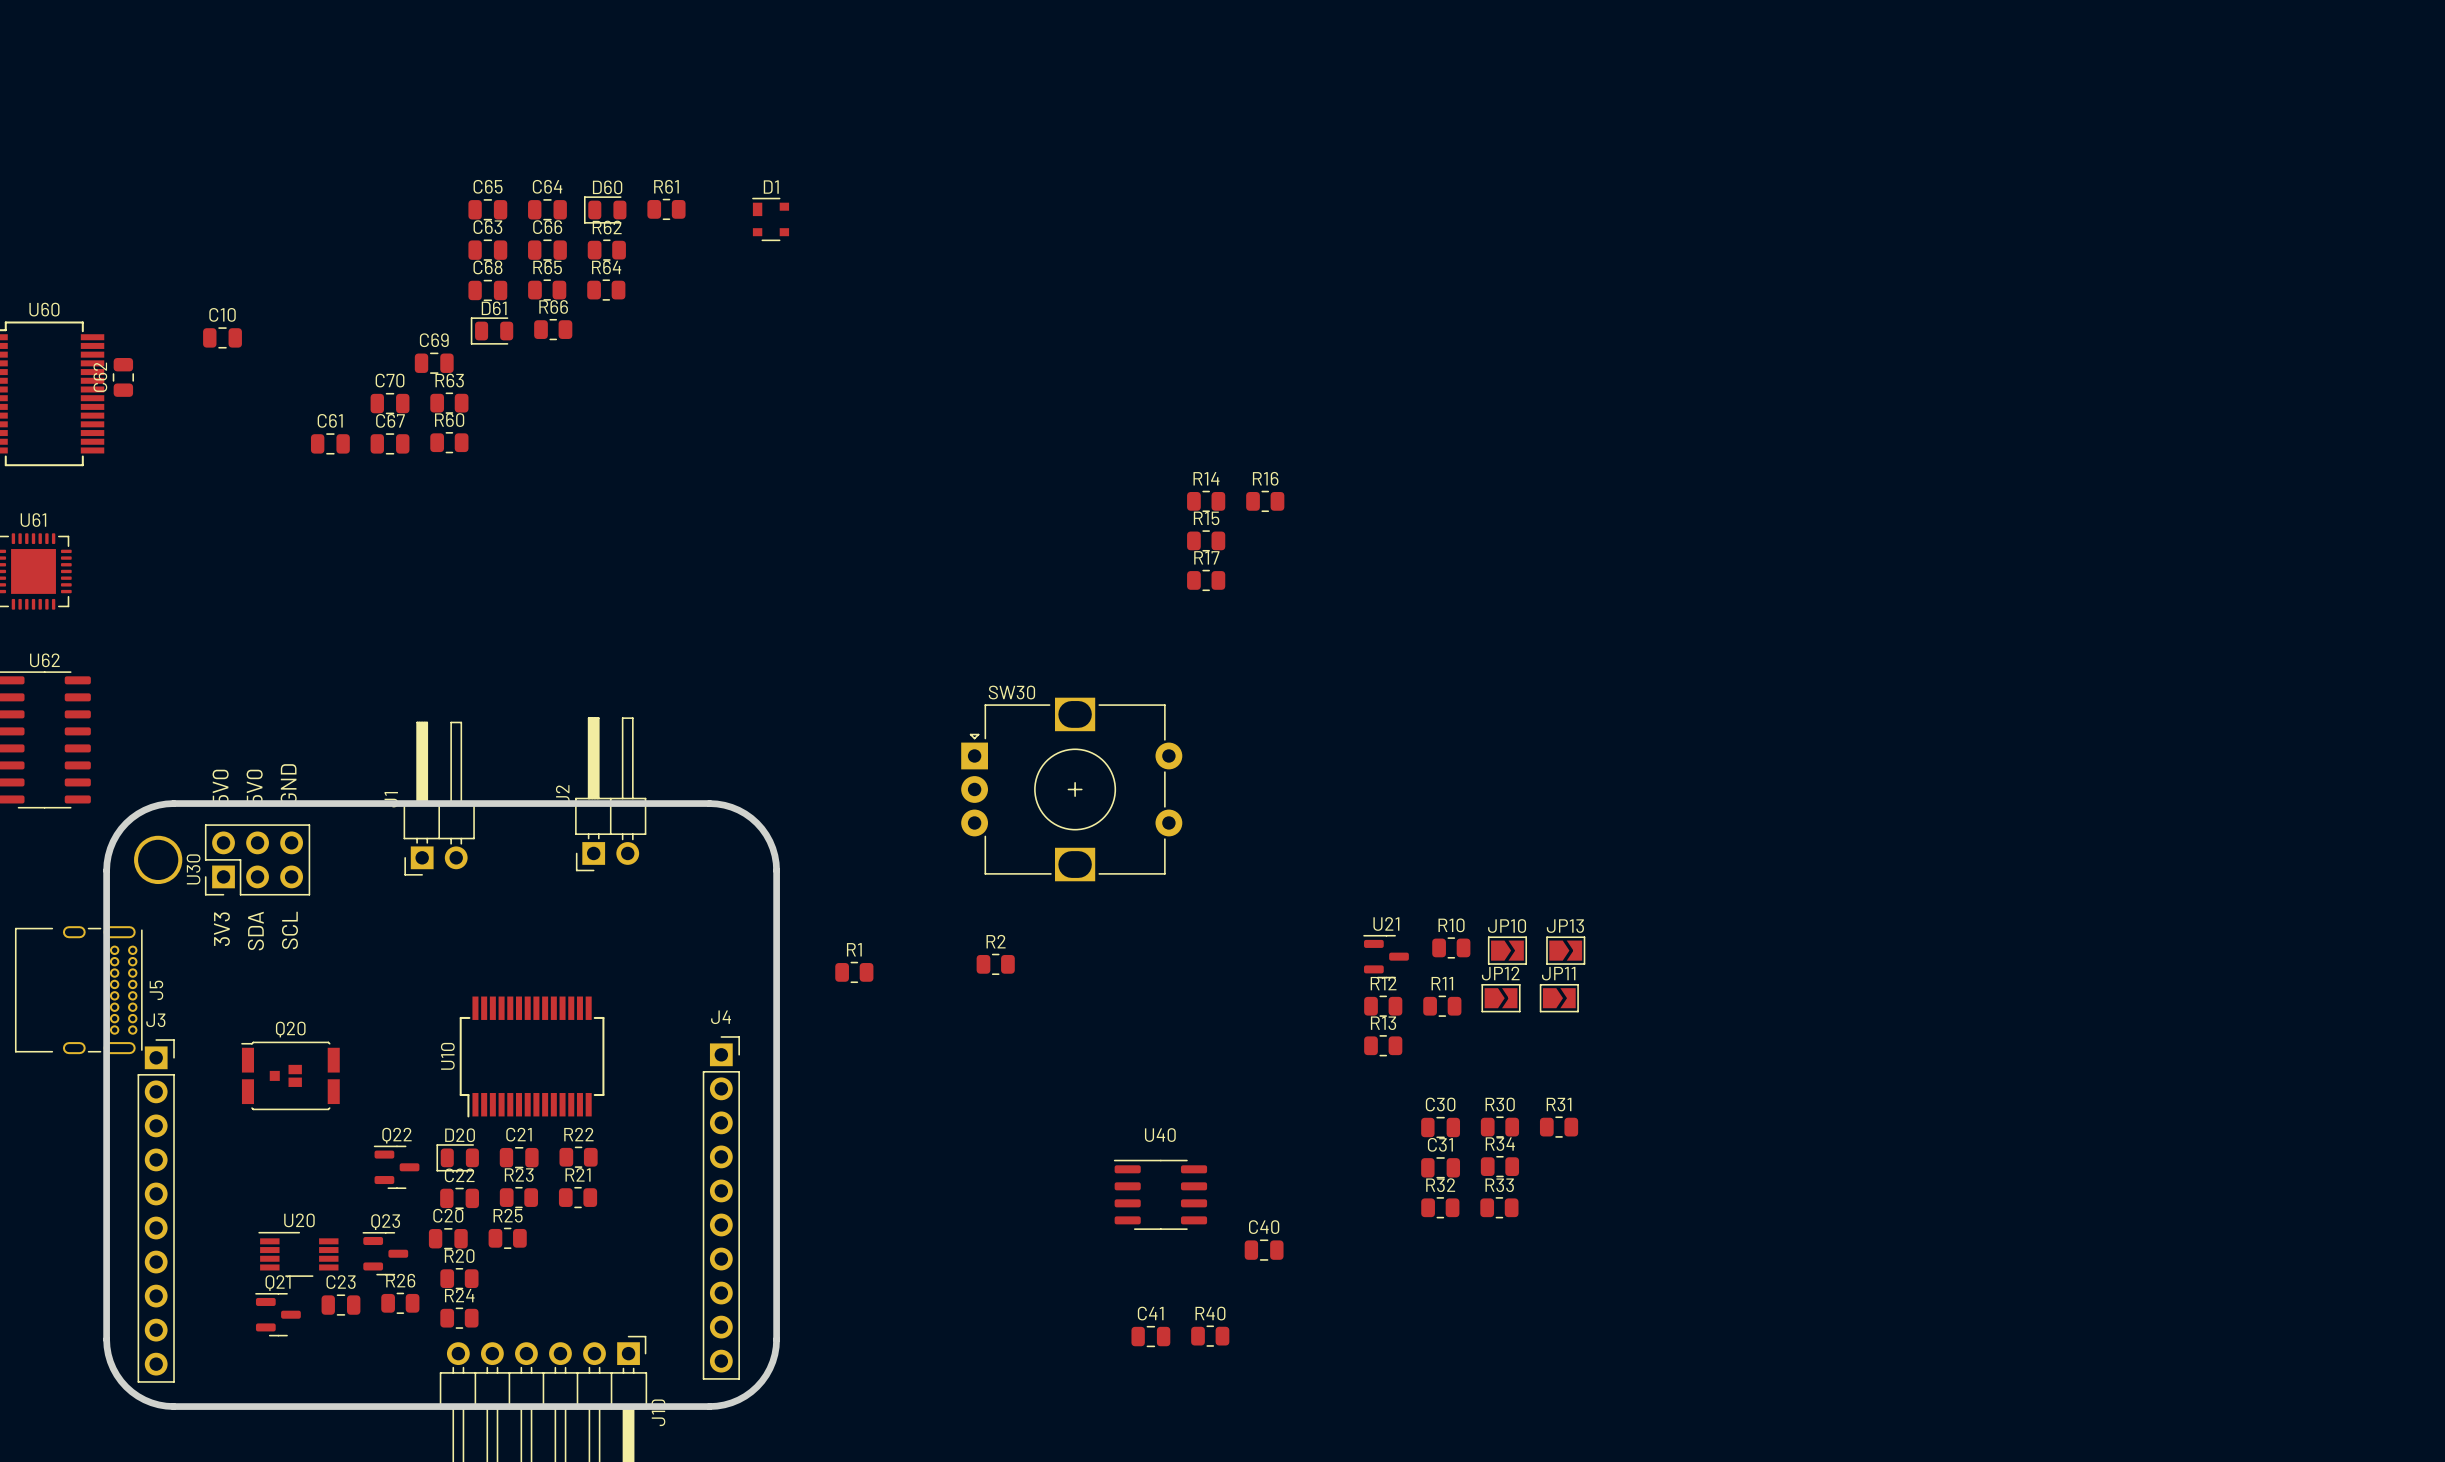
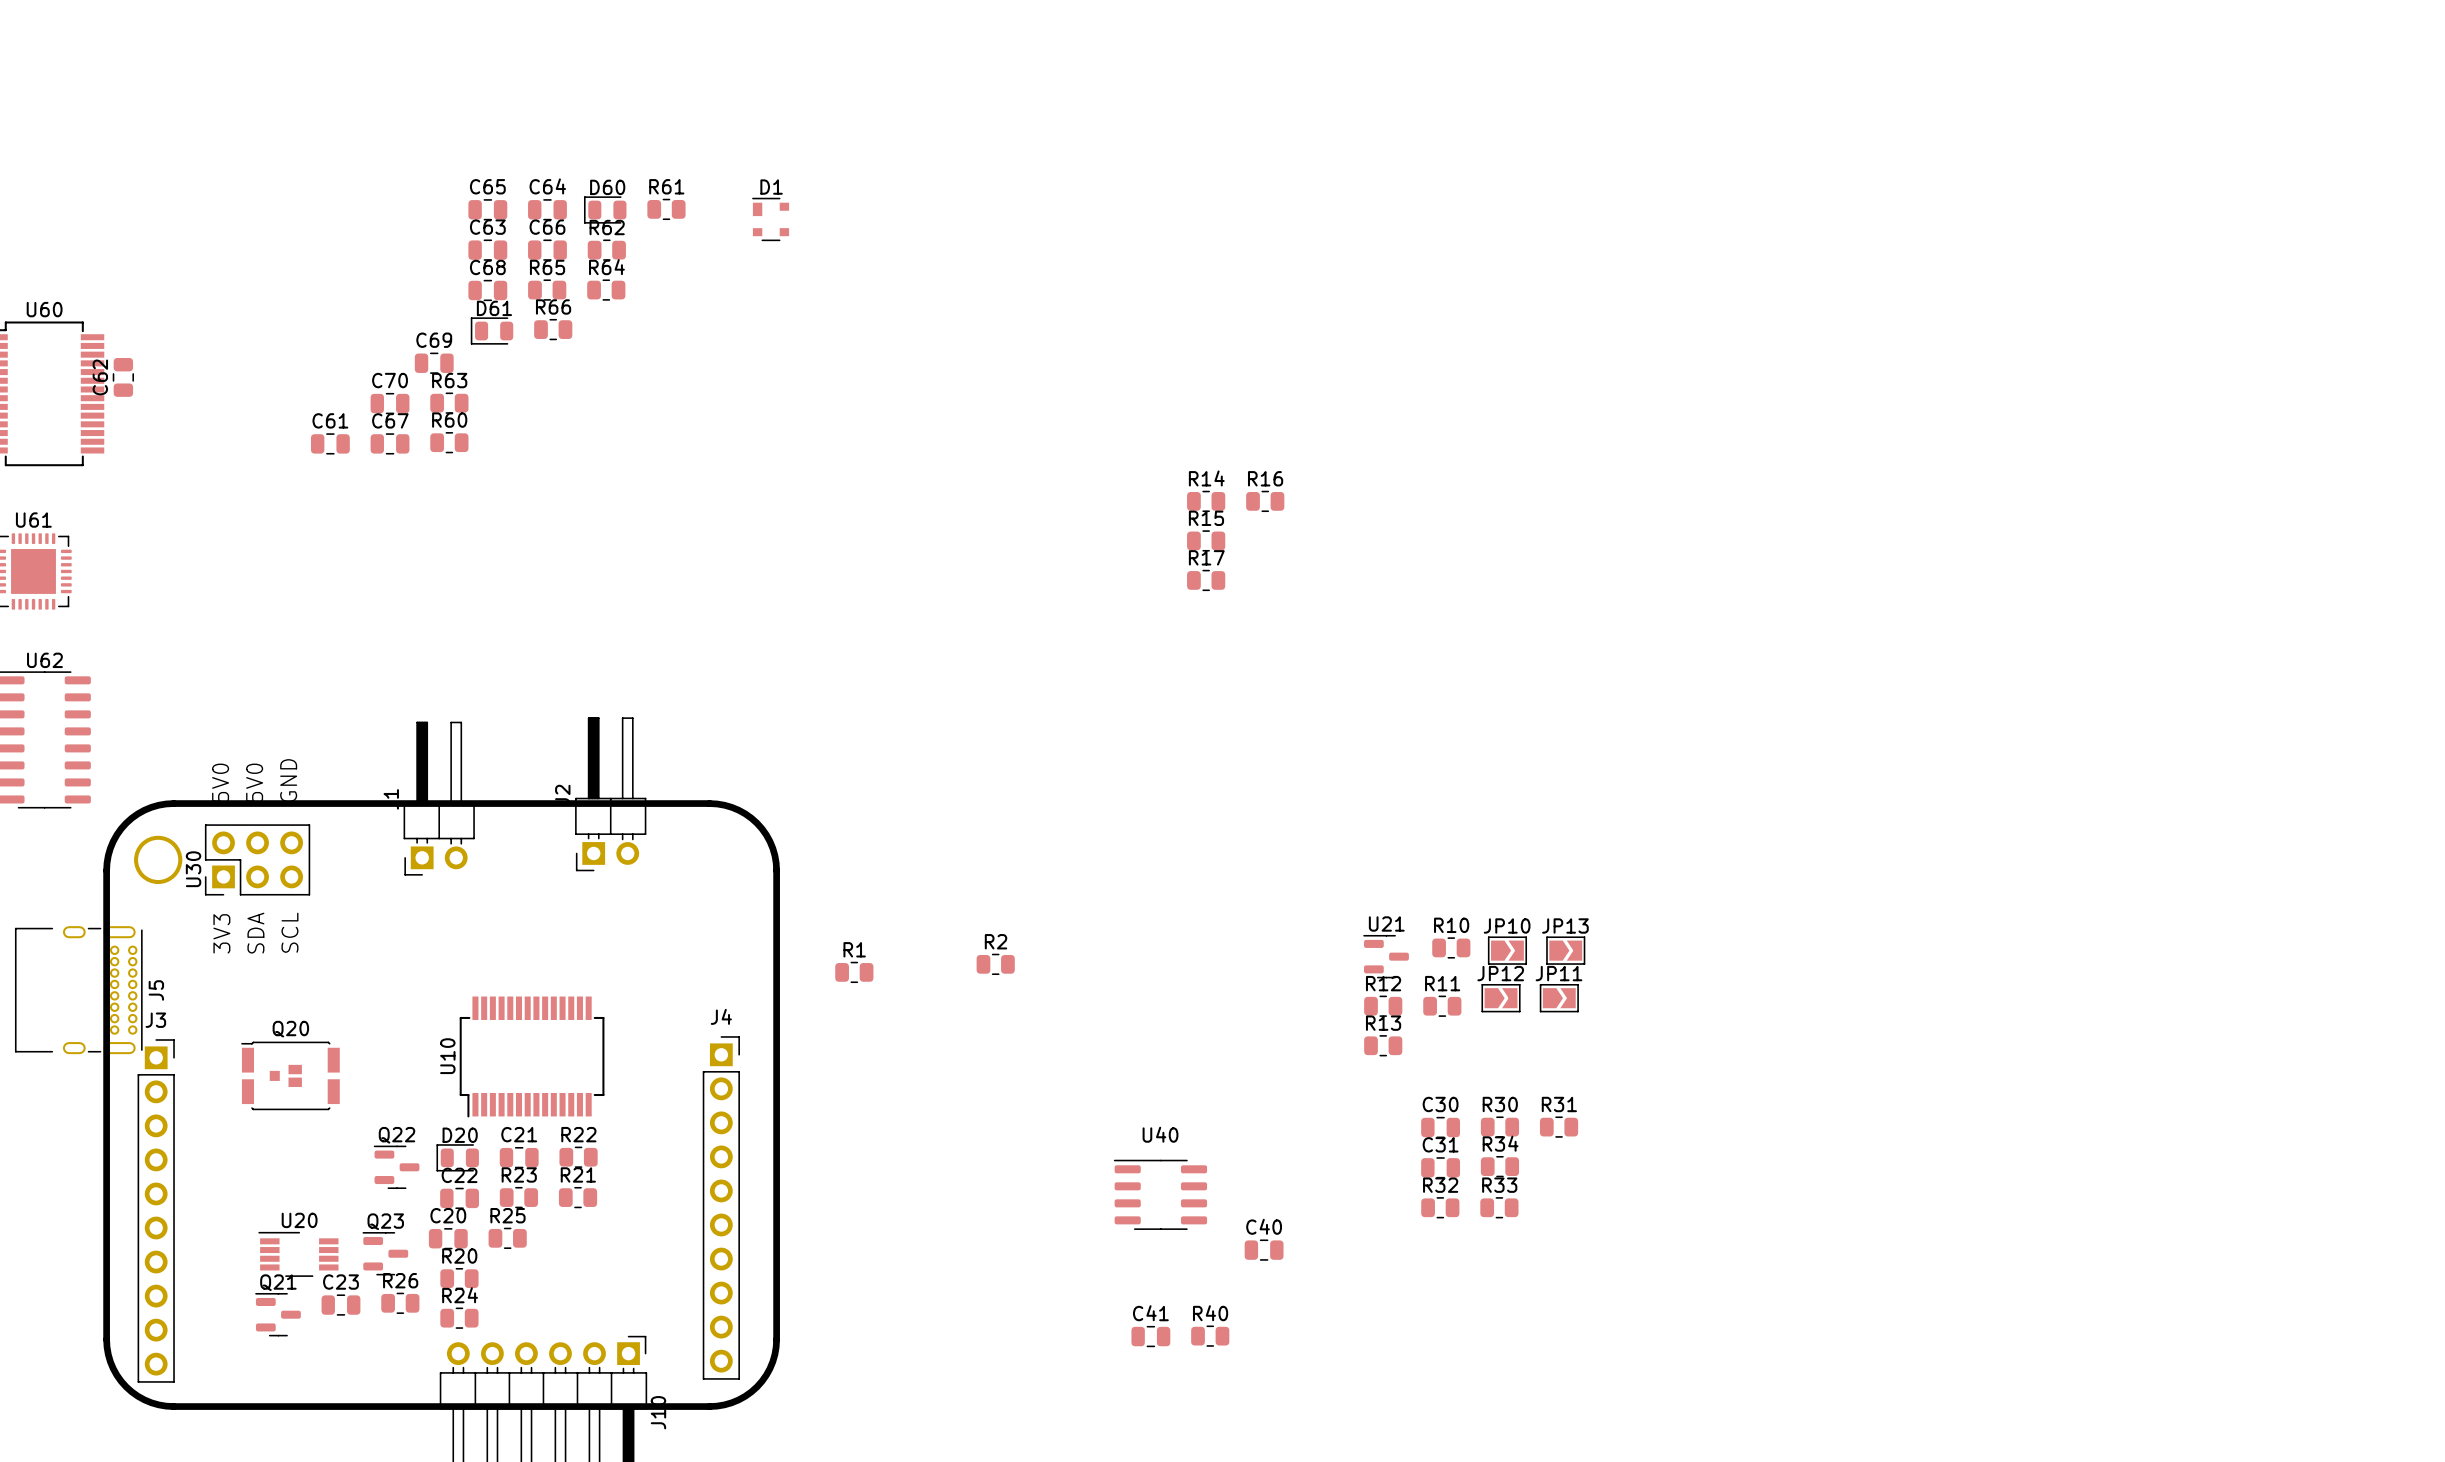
C10: (222, 337) -> none
SW30: (1071, 789) -> none

